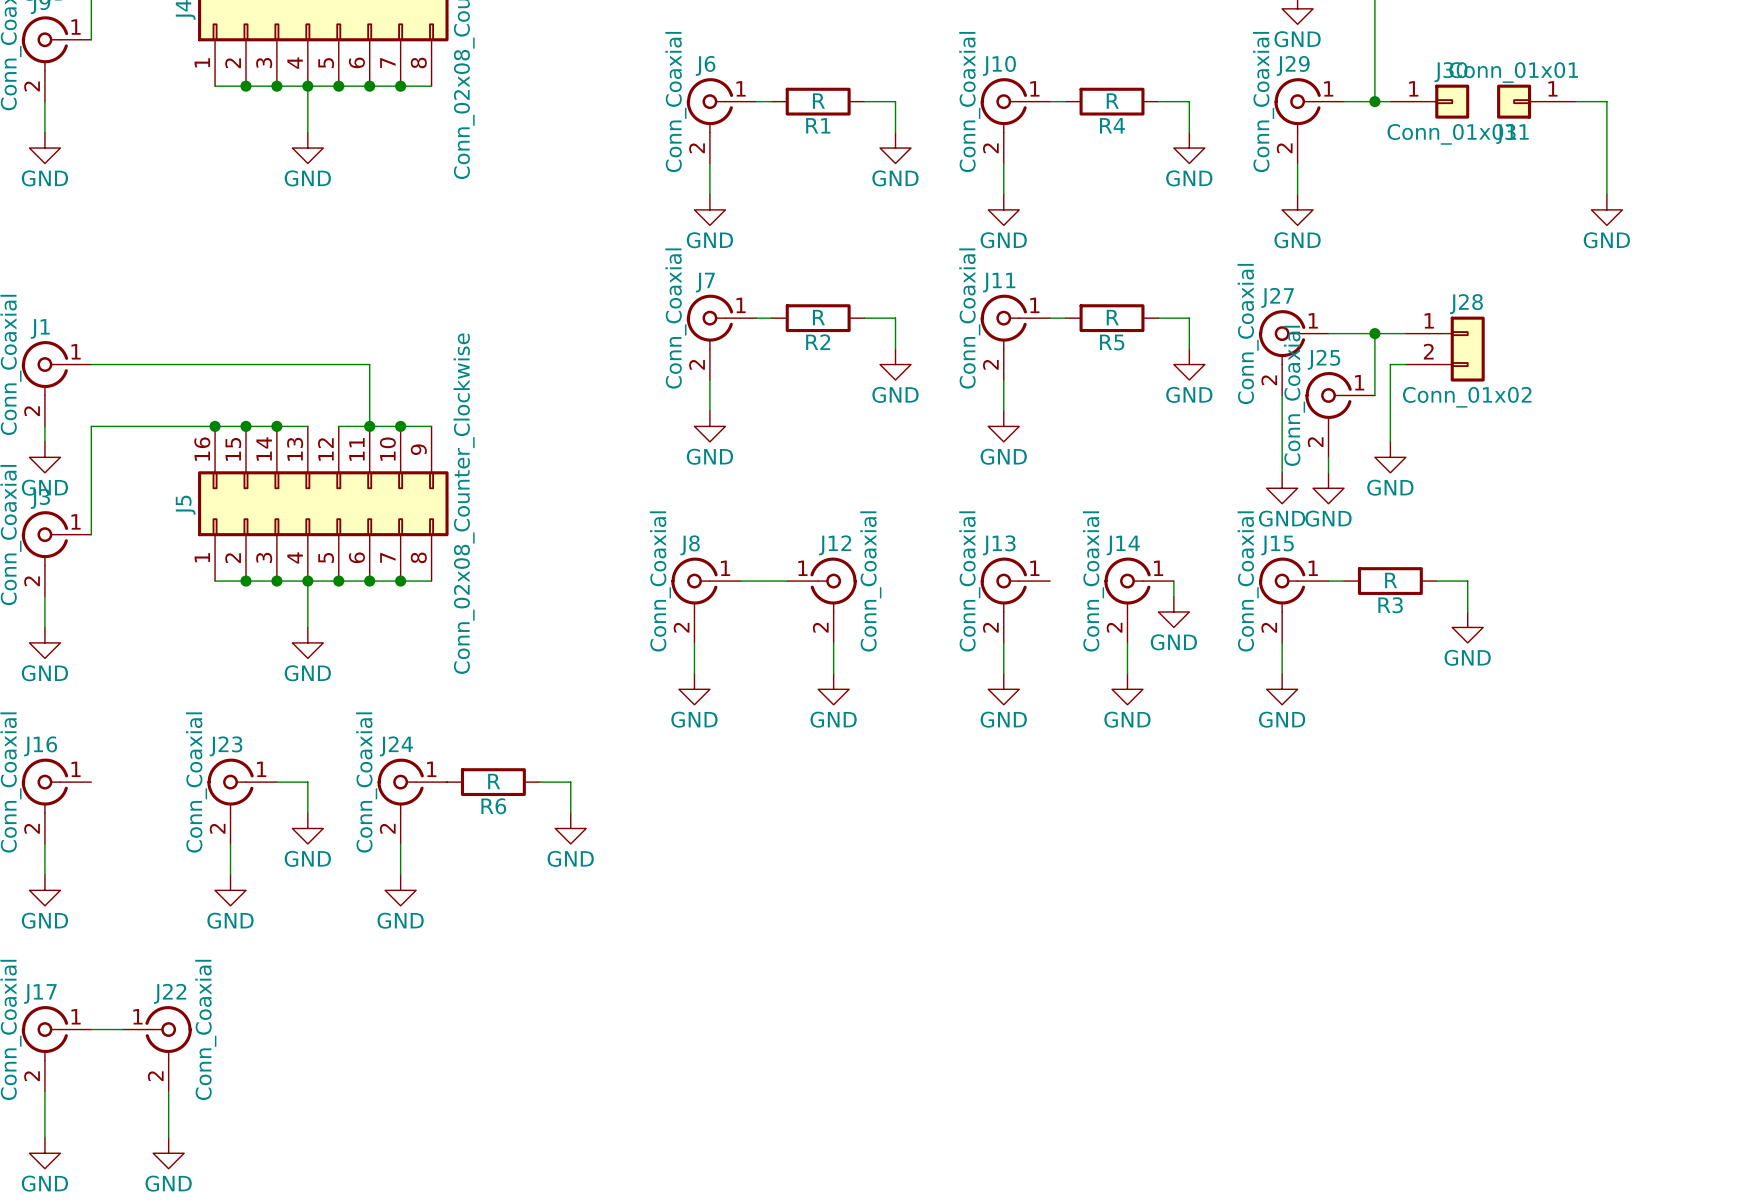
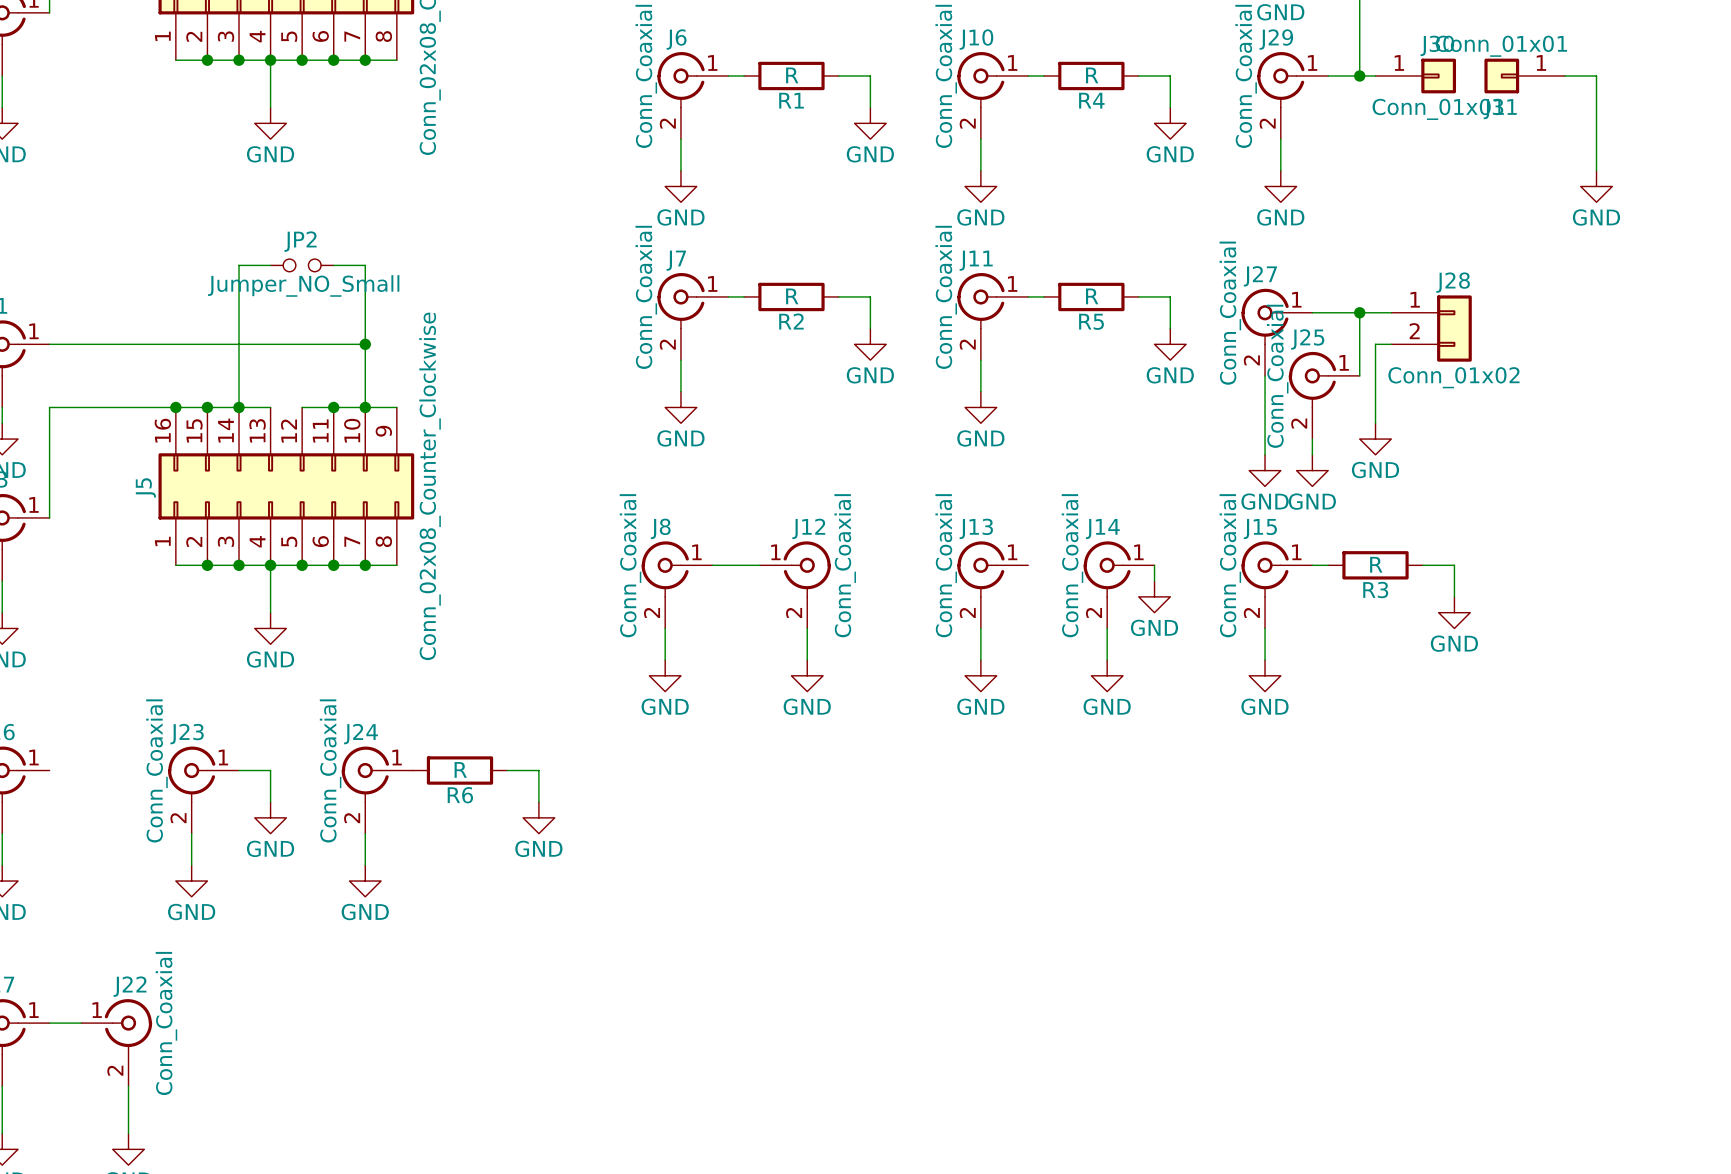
wire: none -> (270, 265) (239, 265) (239, 407)
JP2: none -> Jumper_NO_Small (302, 265)
wire: none -> (333, 265) (365, 265) (365, 407)
wire: (369, 364) (369, 426) -> (333, 344) (365, 344)
junction: none -> (365, 344)

